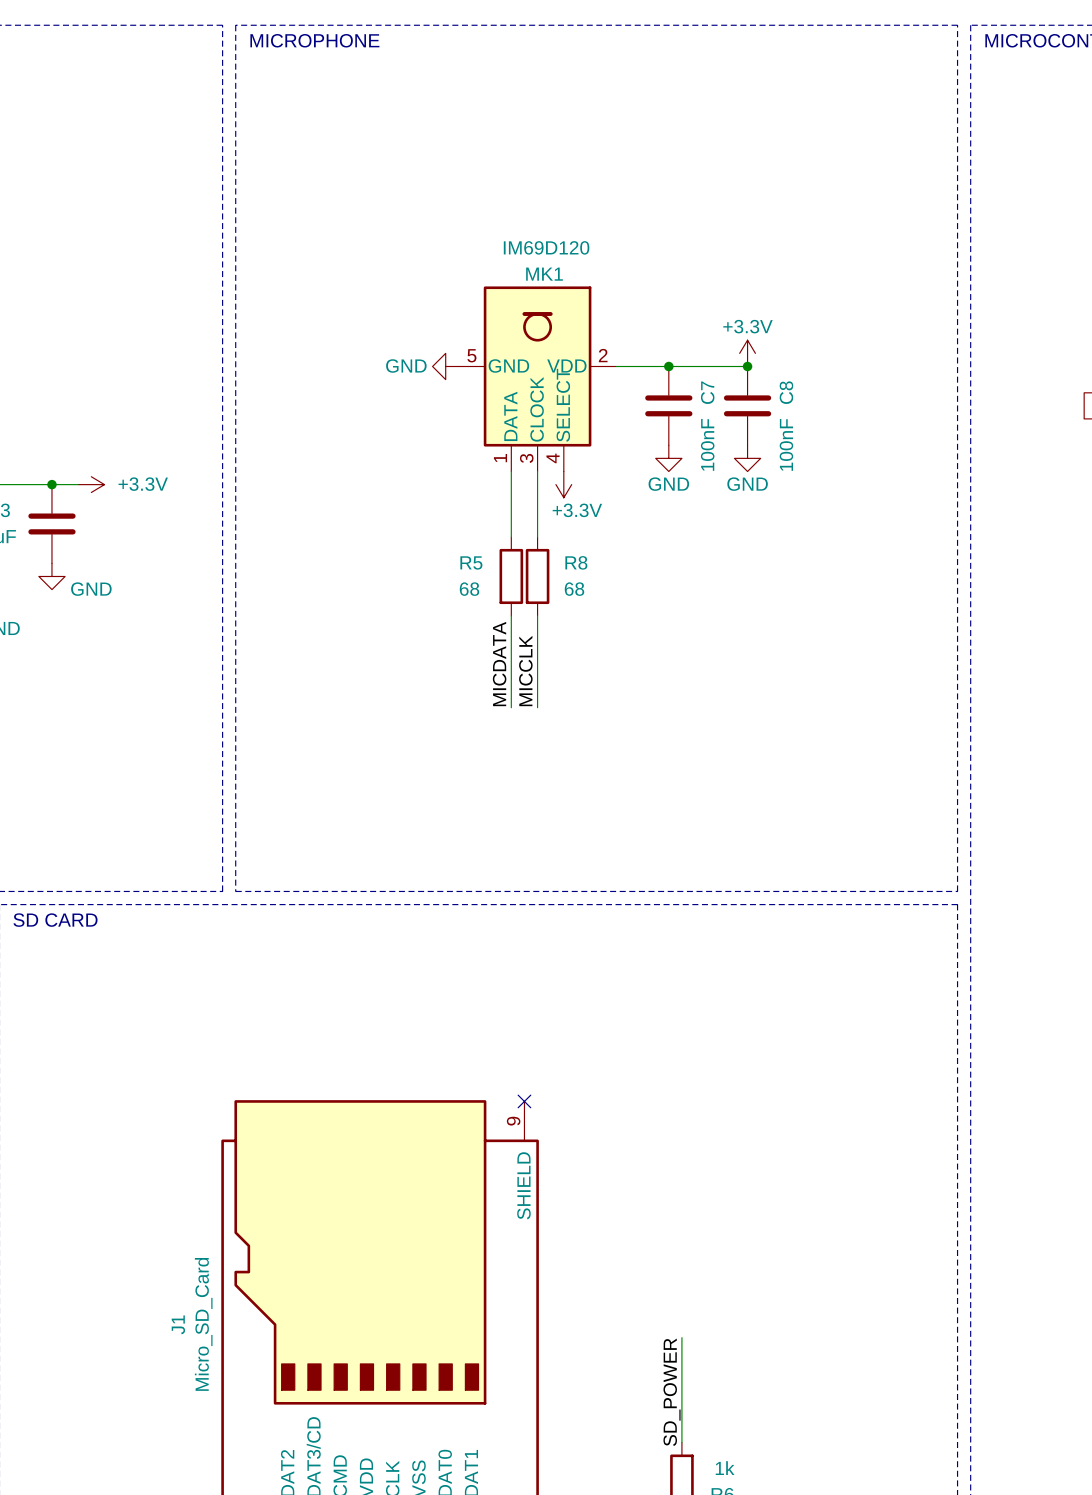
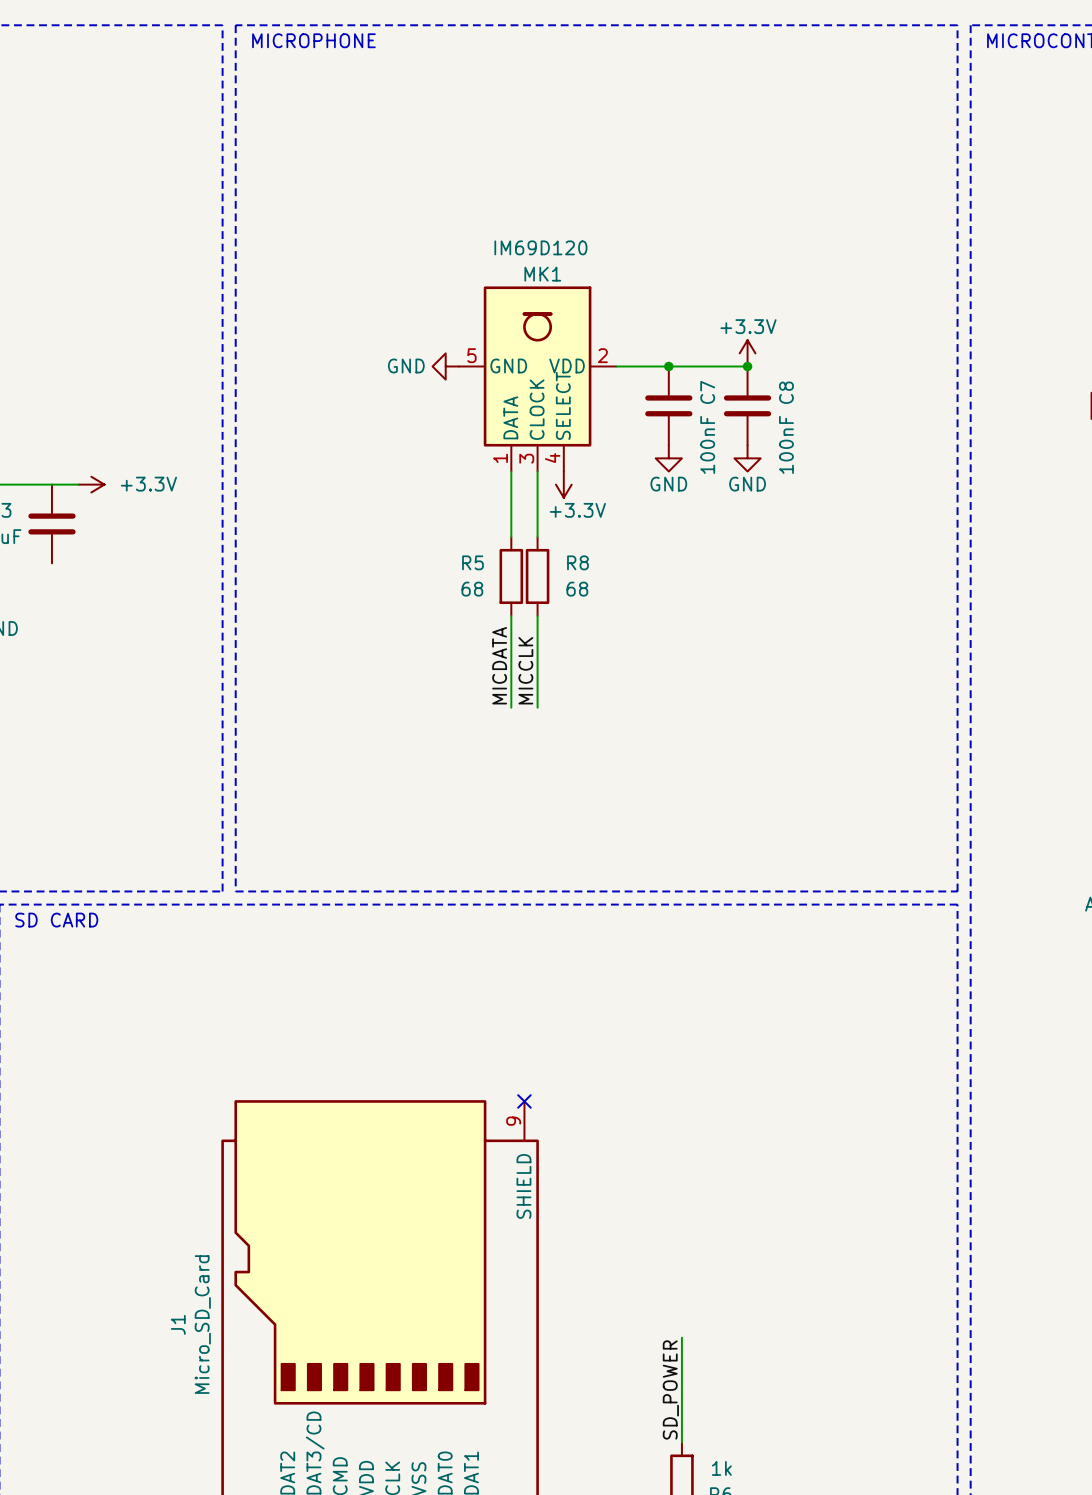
junction: (51, 484) -> none
power symbol: GND (51, 576) -> none

